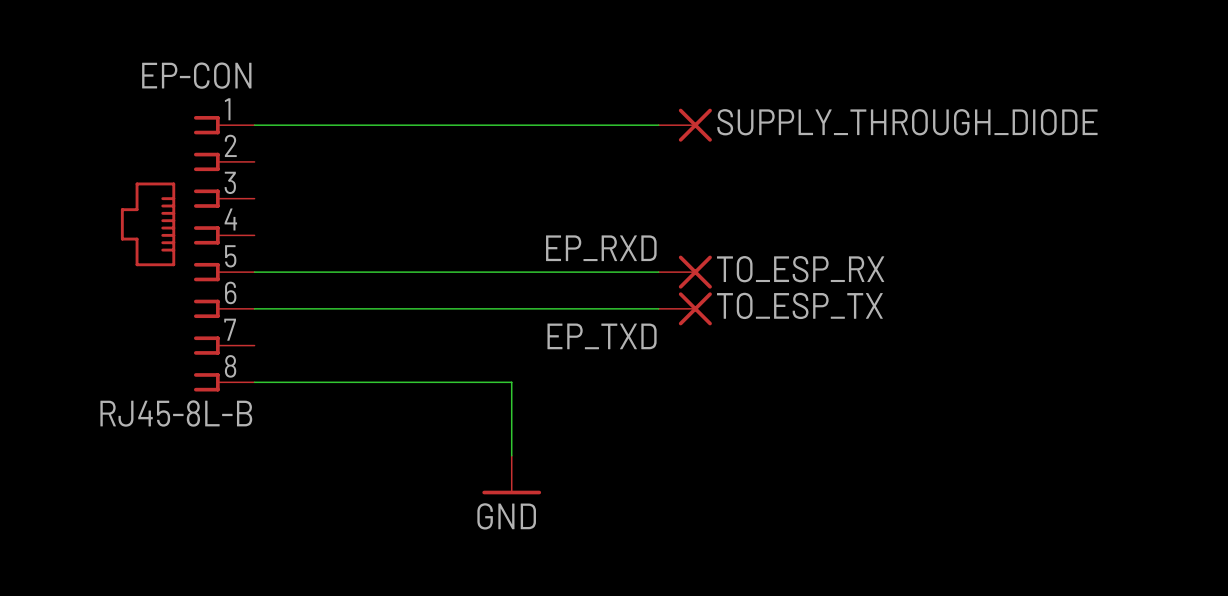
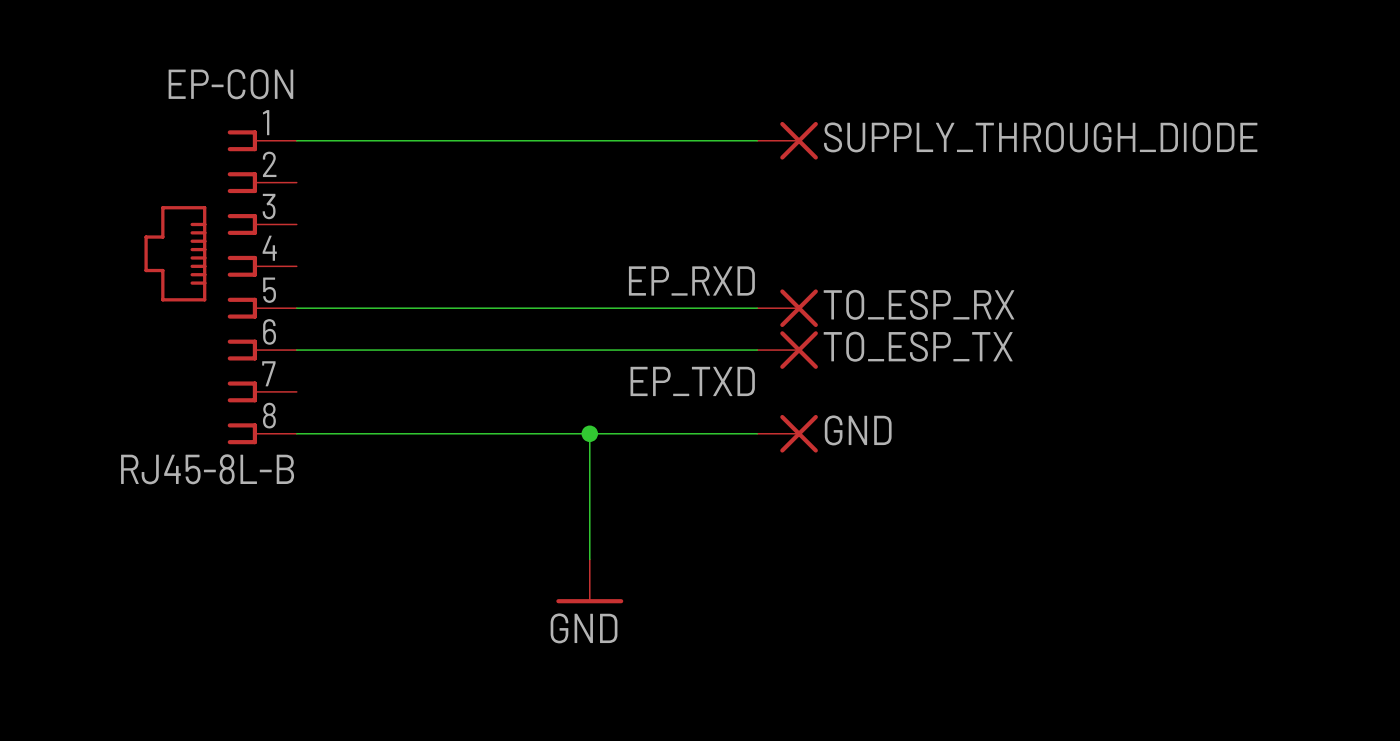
wire: none -> (589, 433) (757, 433)
junction: none -> (589, 433)
GND: none -> (787, 433)
power symbol position: GND (511, 475) -> GND (589, 581)

